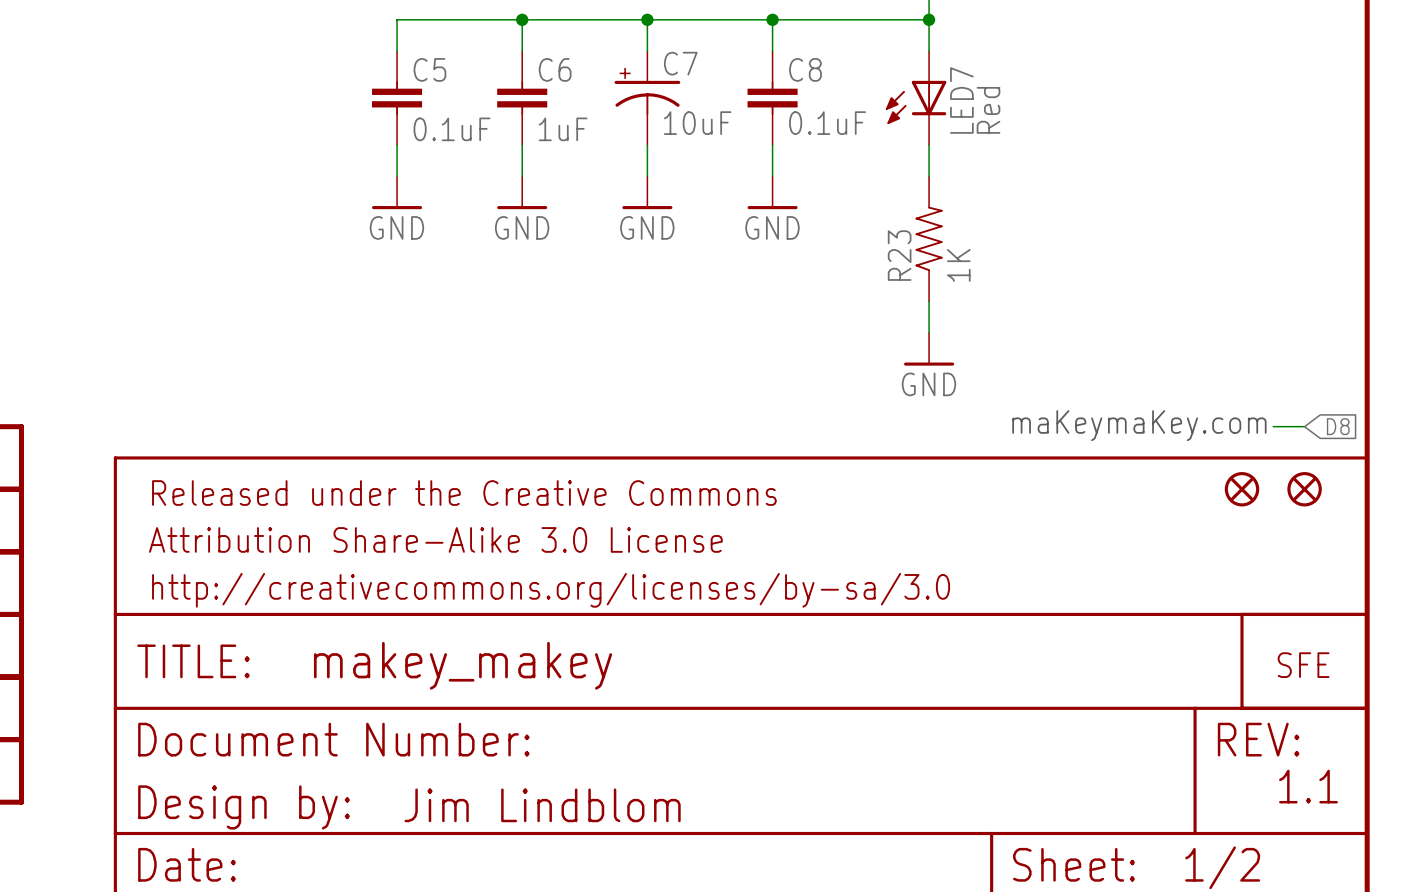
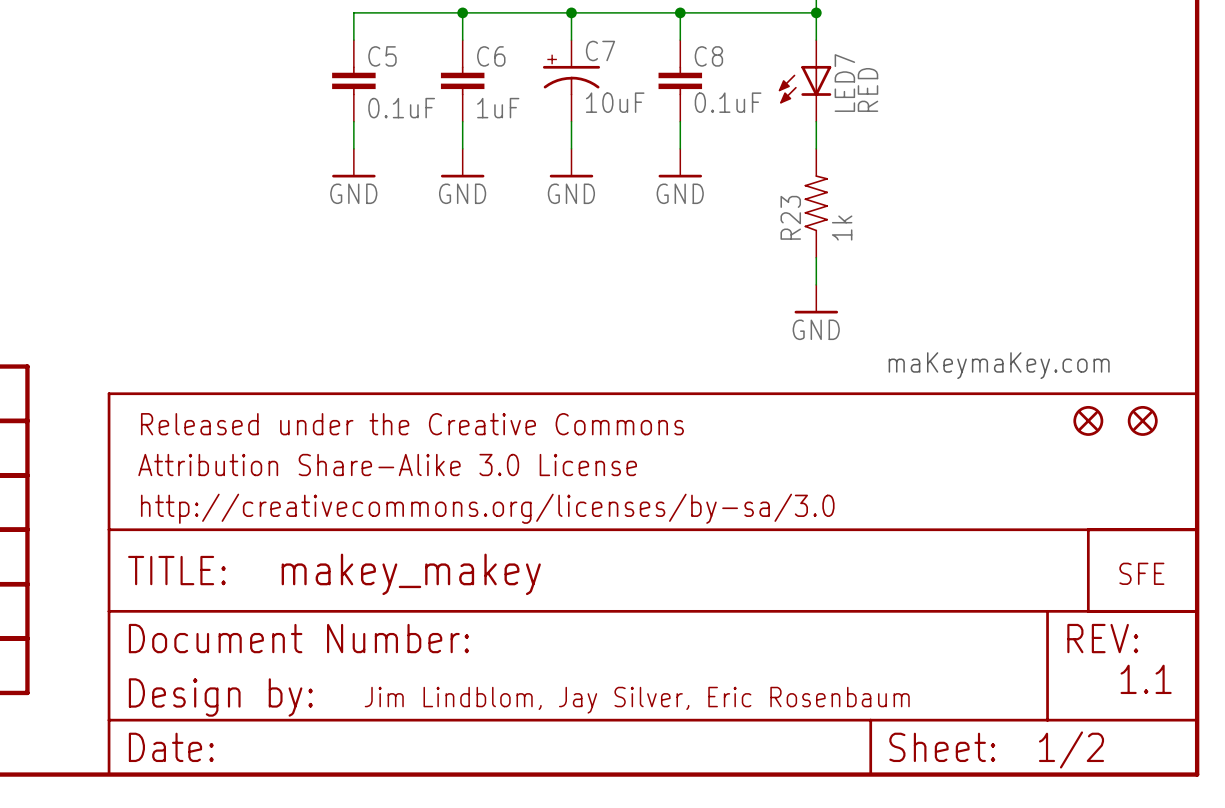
LED7 value: Red (988, 110) -> RED (867, 89)
R23 value: 1K (958, 265) -> 1k (842, 228)
wire: (1273, 426) (1304, 426) -> none
global label: D8 (1338, 426) -> none
text: Jim Lindblom (542, 805) -> Jim Lindblom, Jay Silver, Eric Rosenbaum (637, 700)

